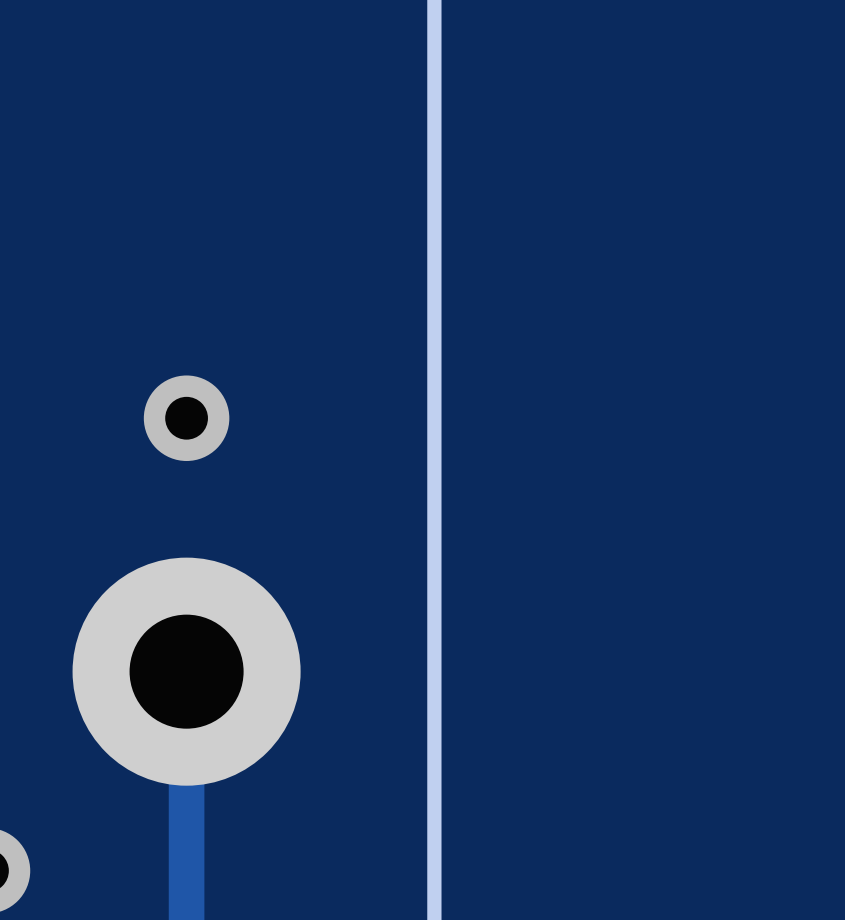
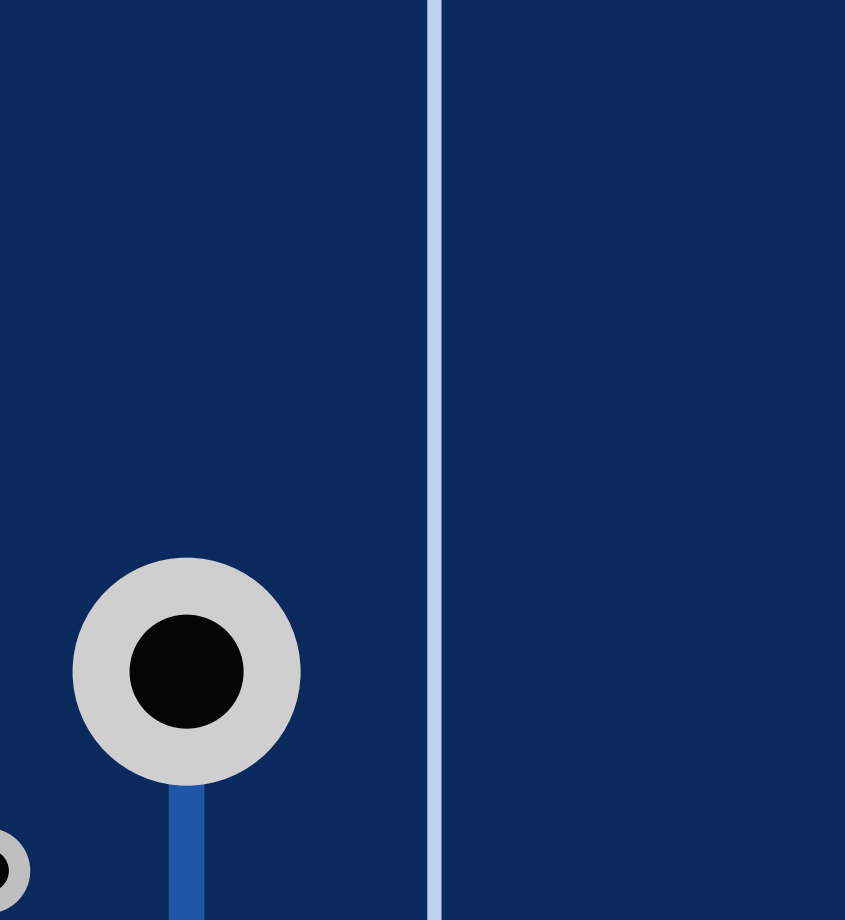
via: (186, 418) -> none

